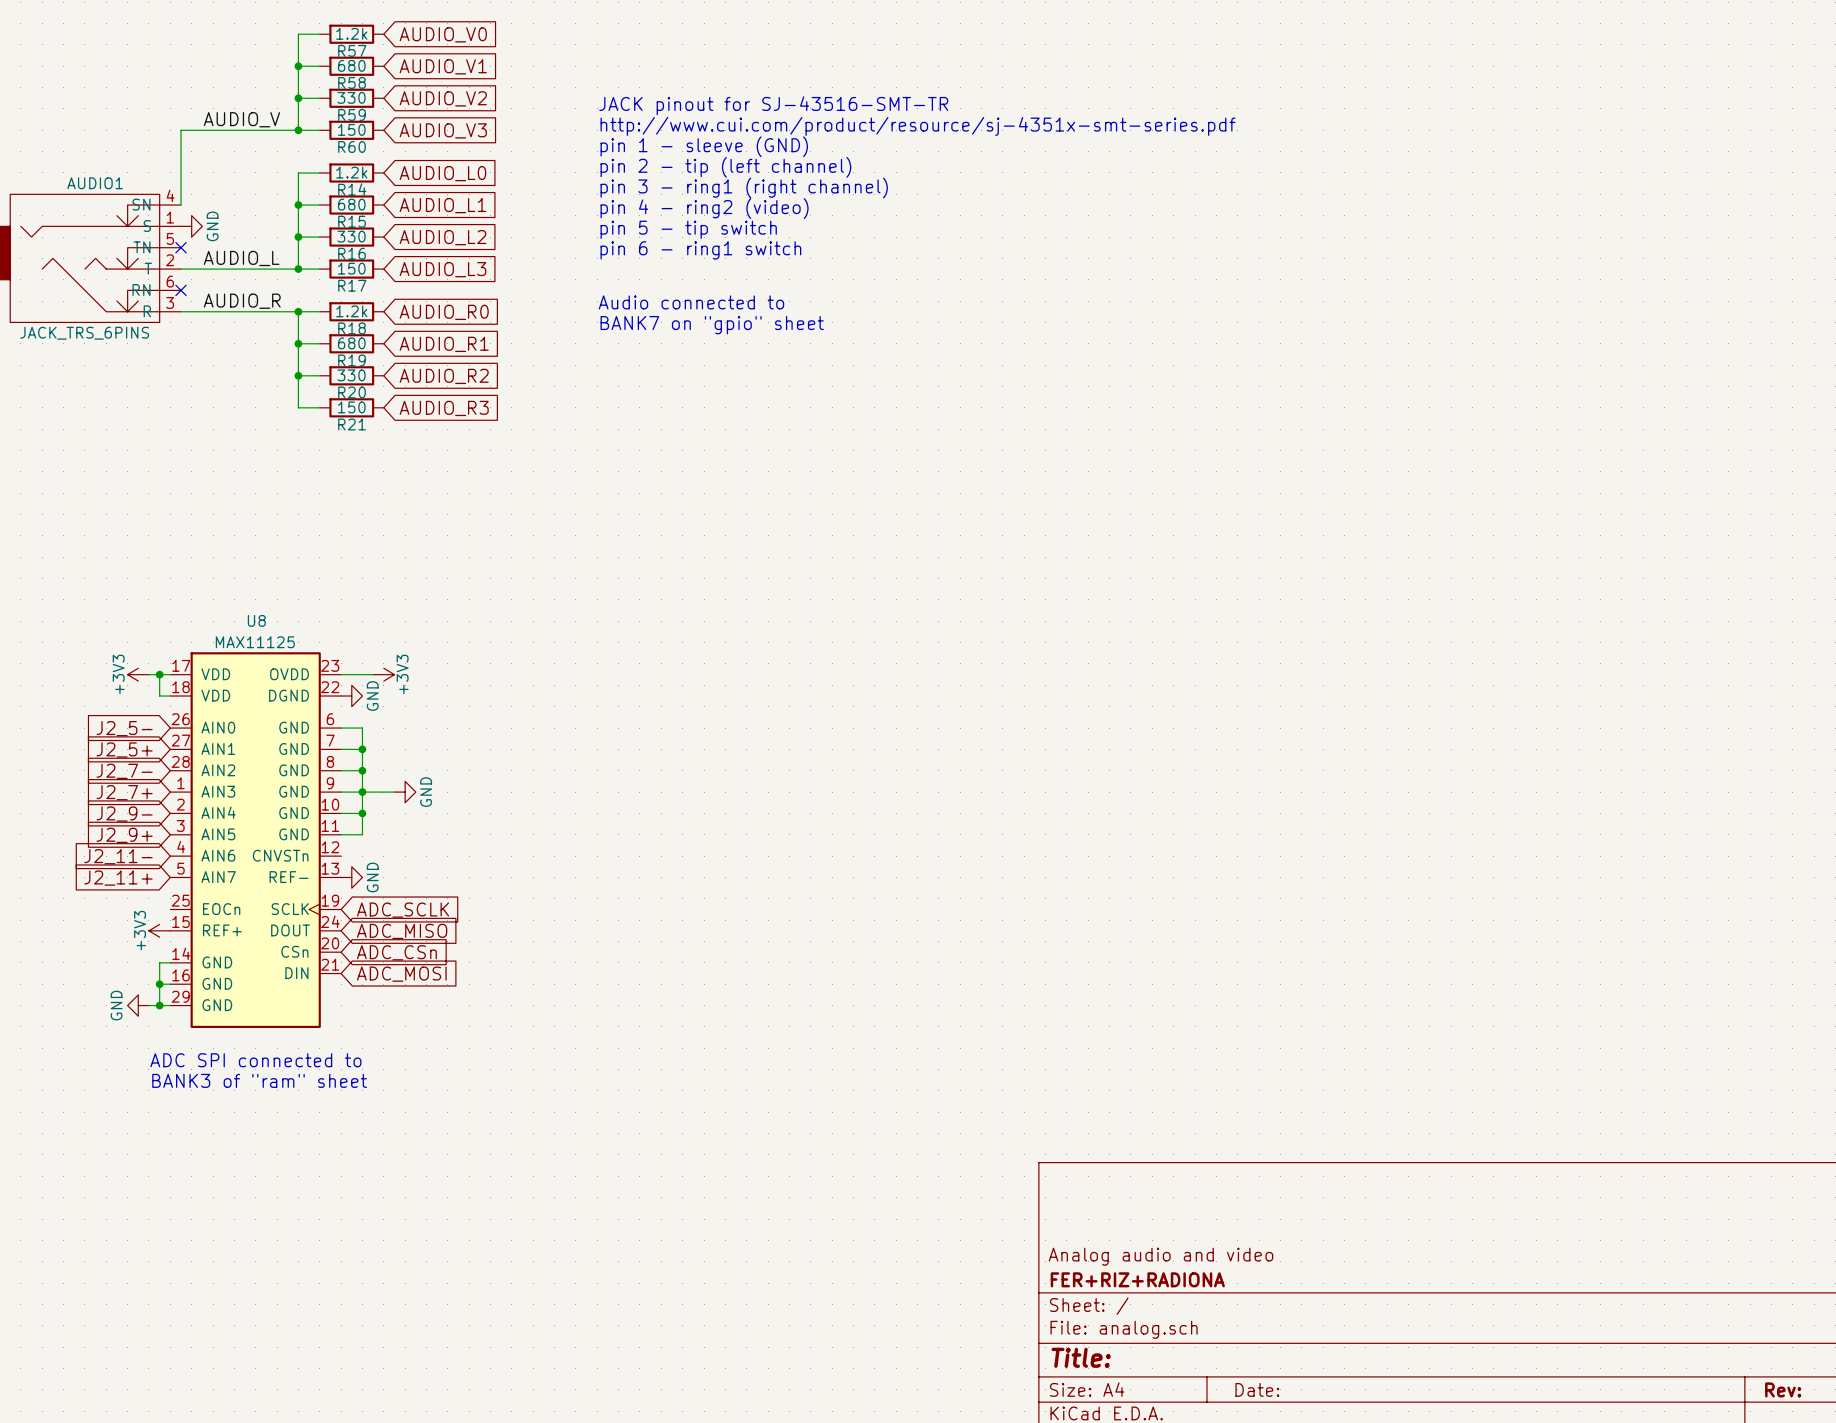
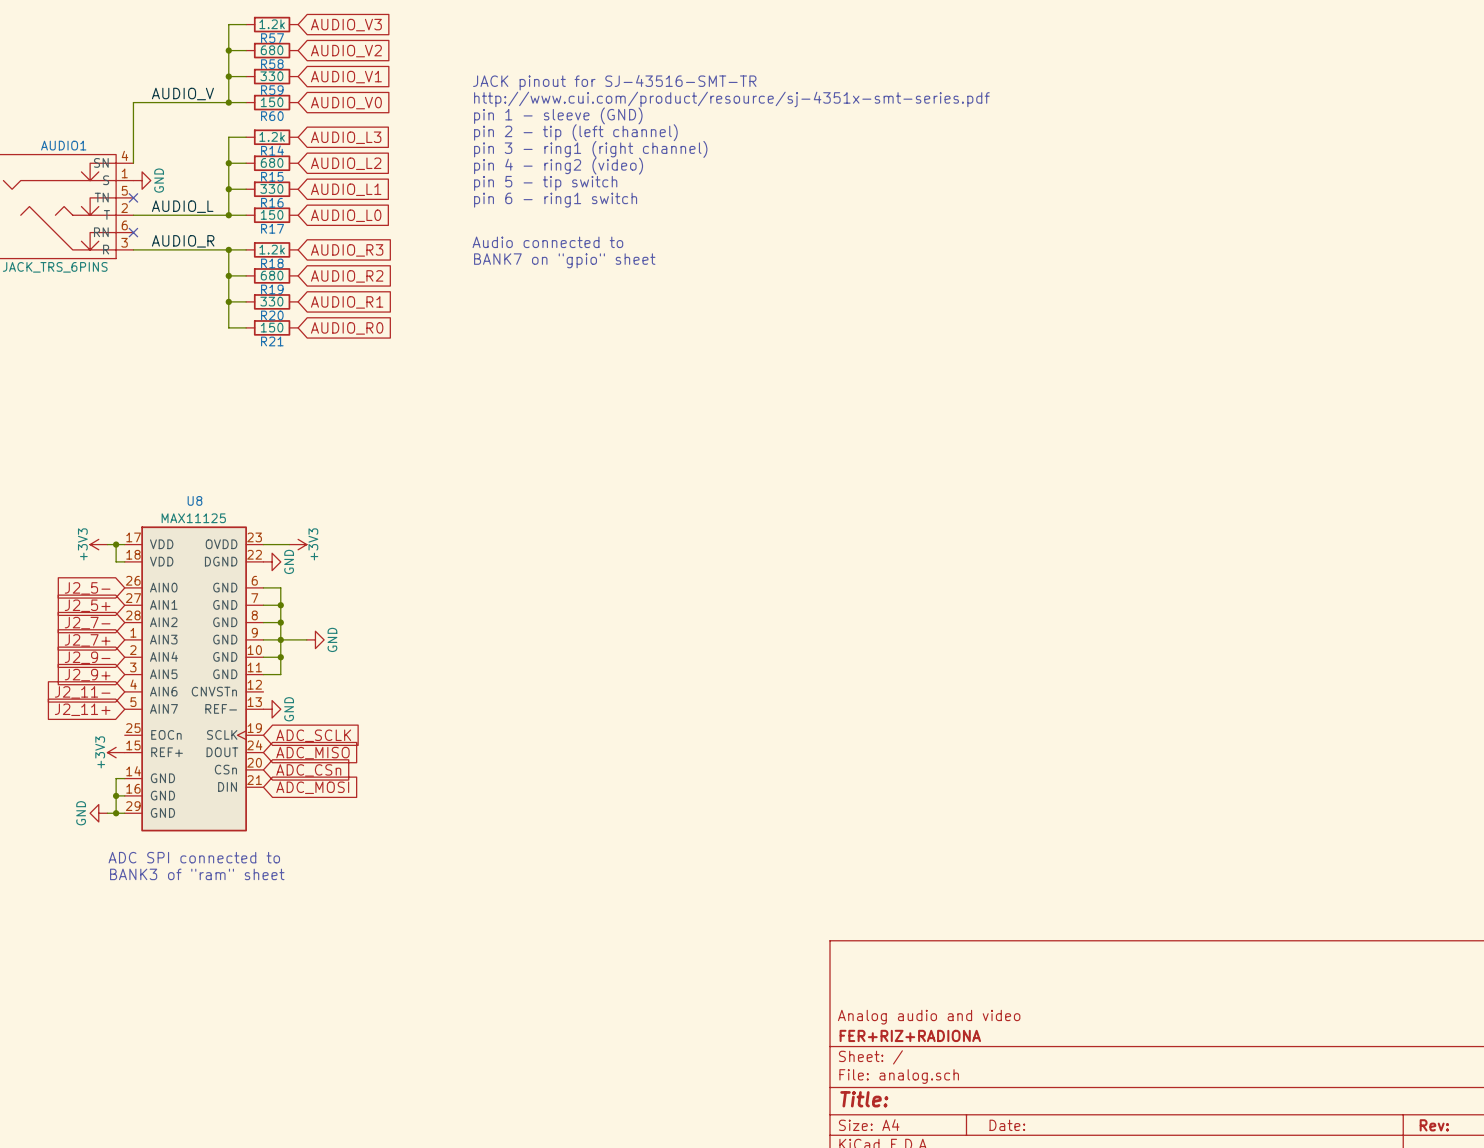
global label: AUDIO_V0 (443, 34) -> AUDIO_V3 (346, 25)
global label: AUDIO_V1 (443, 66) -> AUDIO_V2 (346, 51)
global label: AUDIO_V2 (443, 98) -> AUDIO_V1 (346, 77)
global label: AUDIO_V3 (443, 130) -> AUDIO_V0 (346, 103)
global label: AUDIO_L0 (442, 173) -> AUDIO_L3 (346, 137)
global label: AUDIO_L1 (442, 205) -> AUDIO_L2 (346, 163)
global label: AUDIO_L2 (442, 237) -> AUDIO_L1 (346, 189)
global label: AUDIO_L3 (442, 269) -> AUDIO_L0 (346, 215)
global label: AUDIO_R0 (444, 312) -> AUDIO_R3 (347, 250)
global label: AUDIO_R1 (444, 344) -> AUDIO_R2 (347, 276)
global label: AUDIO_R2 (444, 376) -> AUDIO_R1 (347, 302)
global label: AUDIO_R3 (444, 408) -> AUDIO_R0 (347, 328)

